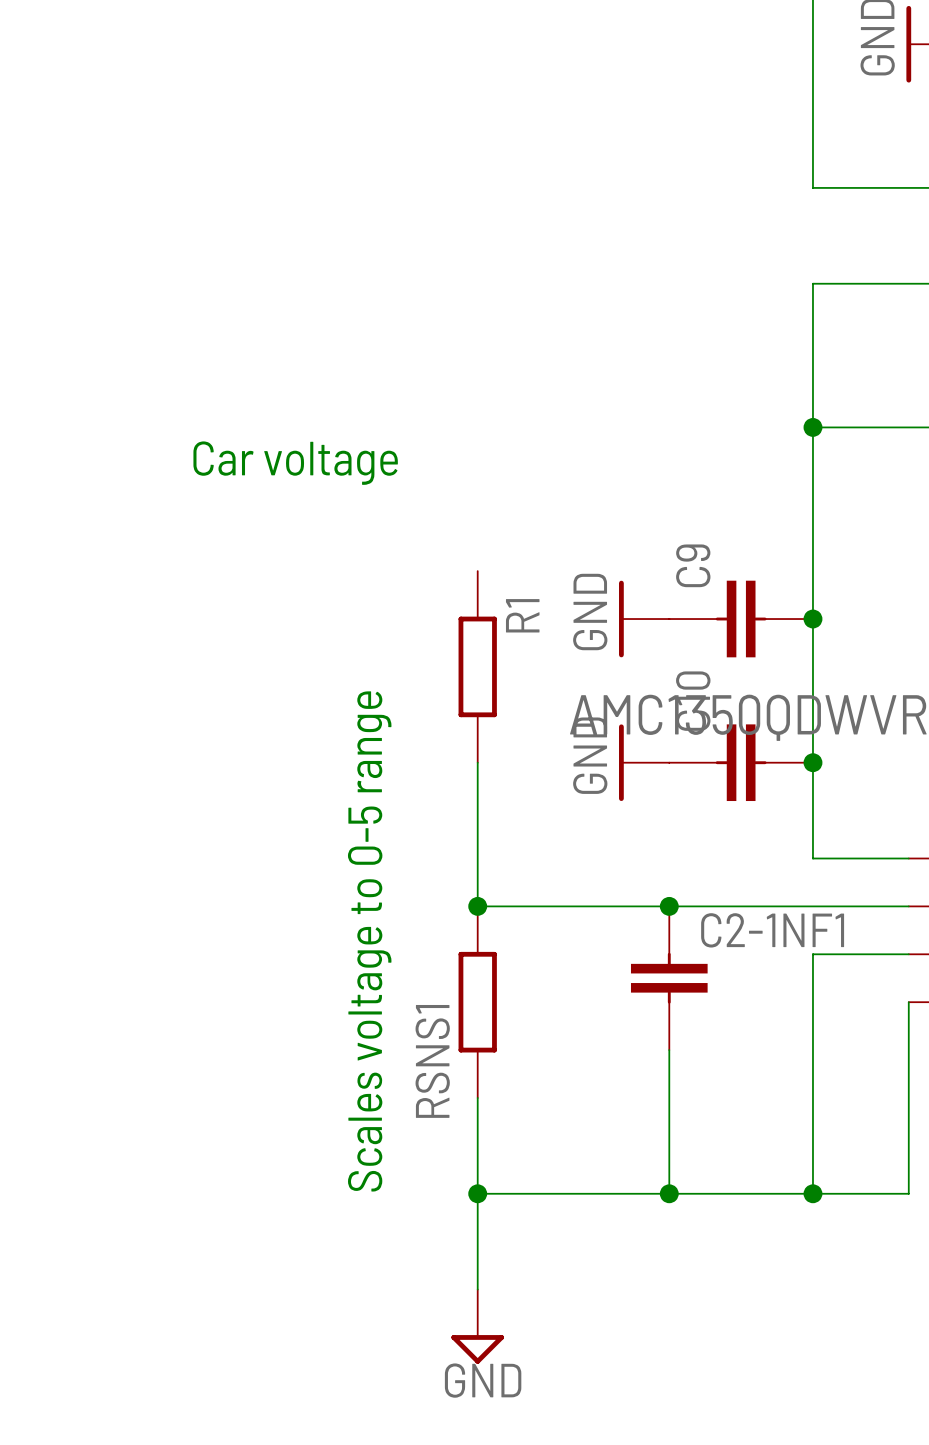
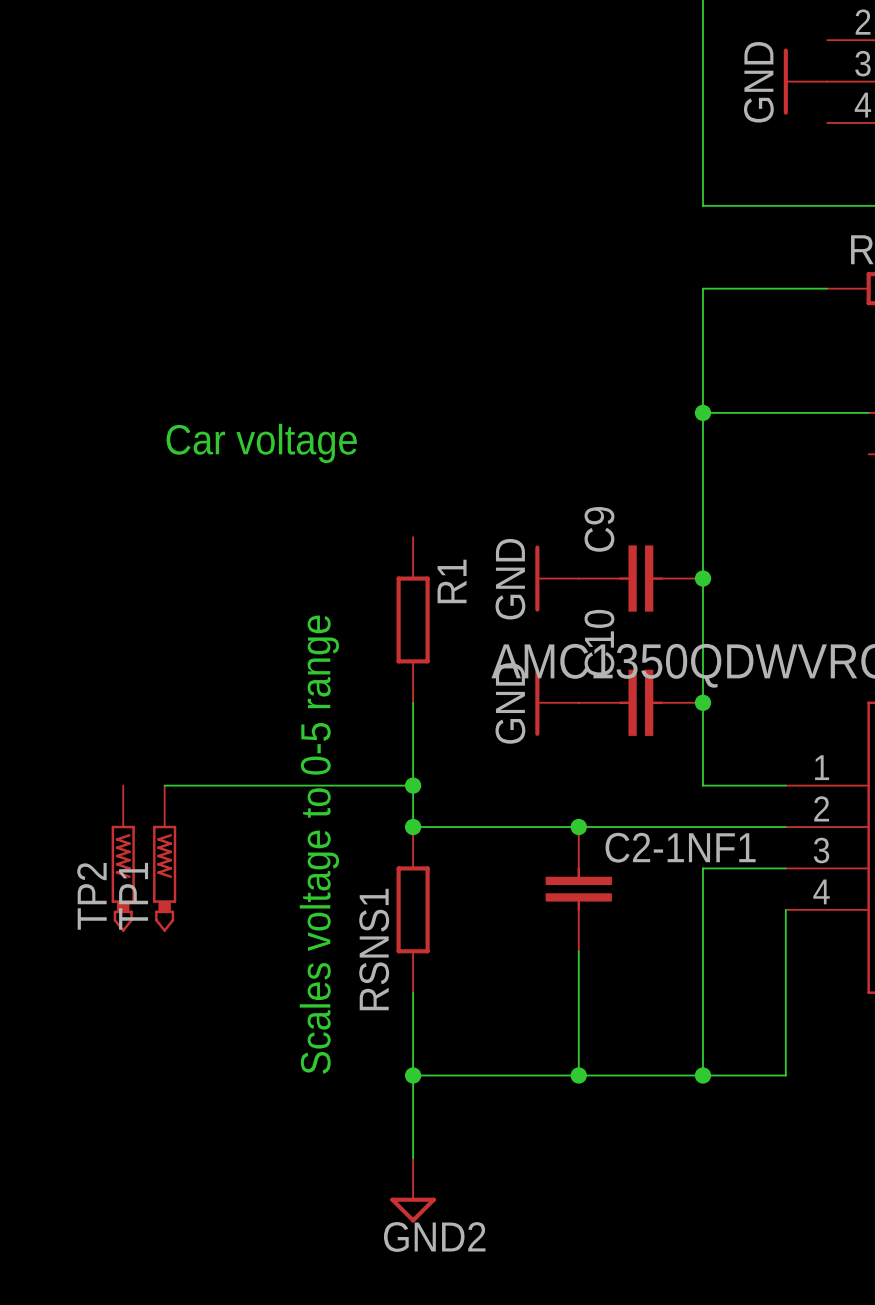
wire: none -> (164, 785) (413, 785)
junction: none -> (413, 785)
TP2: none -> (123, 858)
TP1: none -> (164, 858)
power symbol: GND (477, 1326) -> GND2 (413, 1190)

